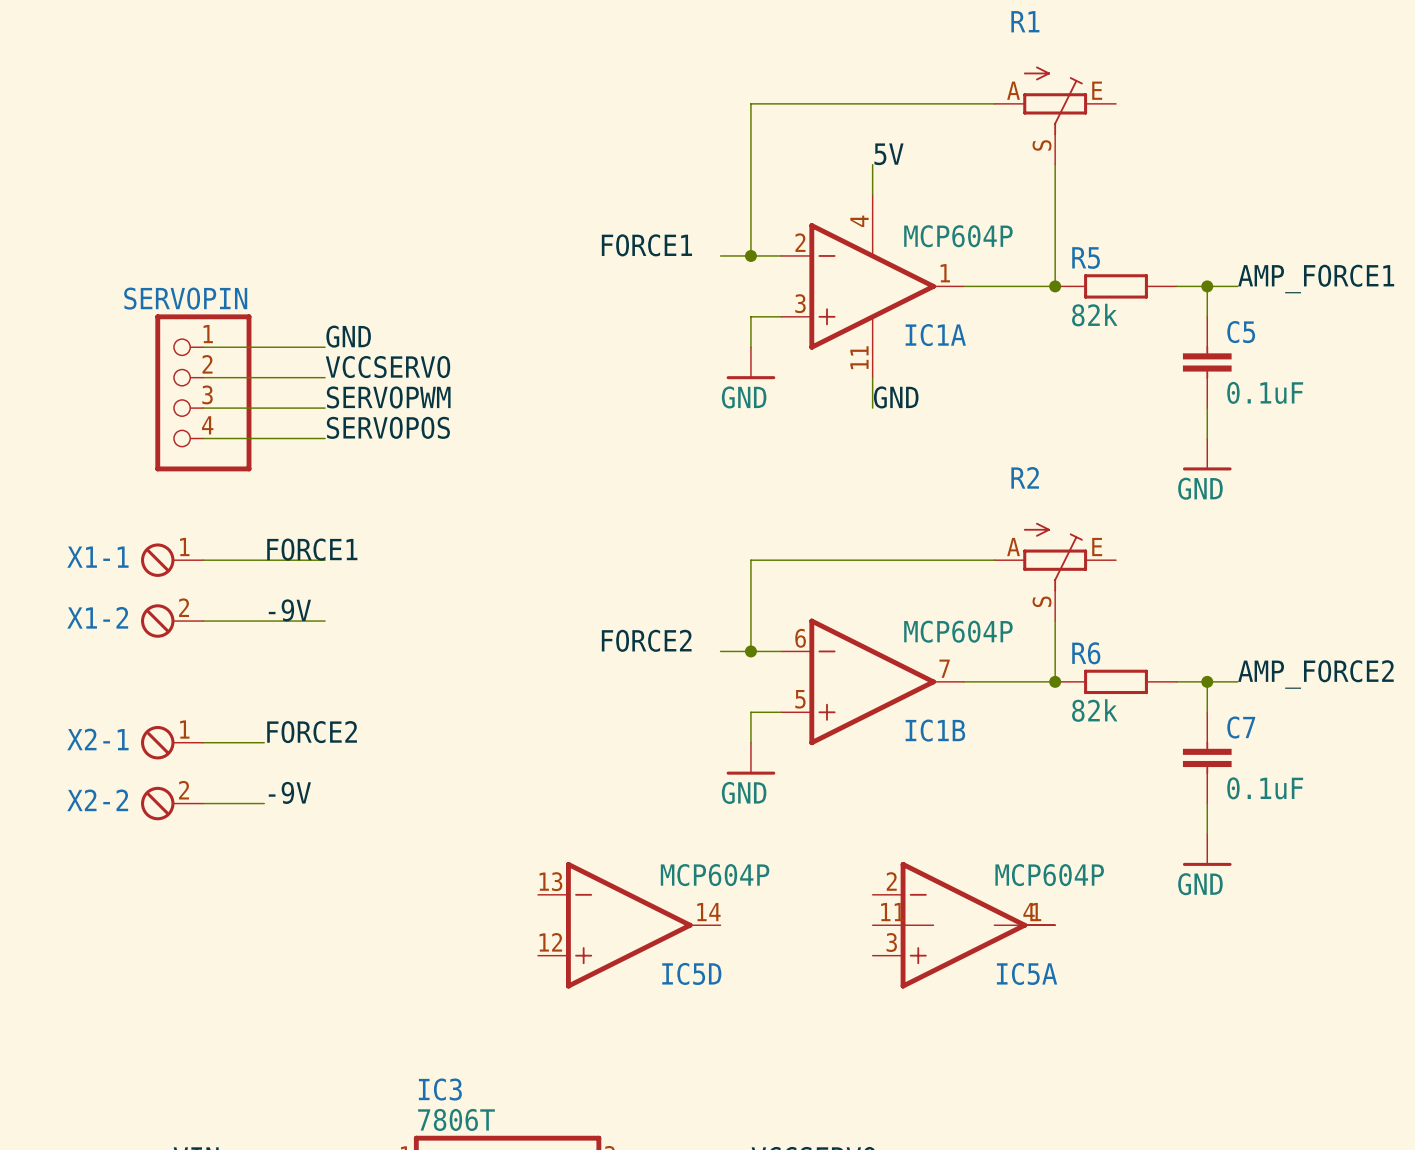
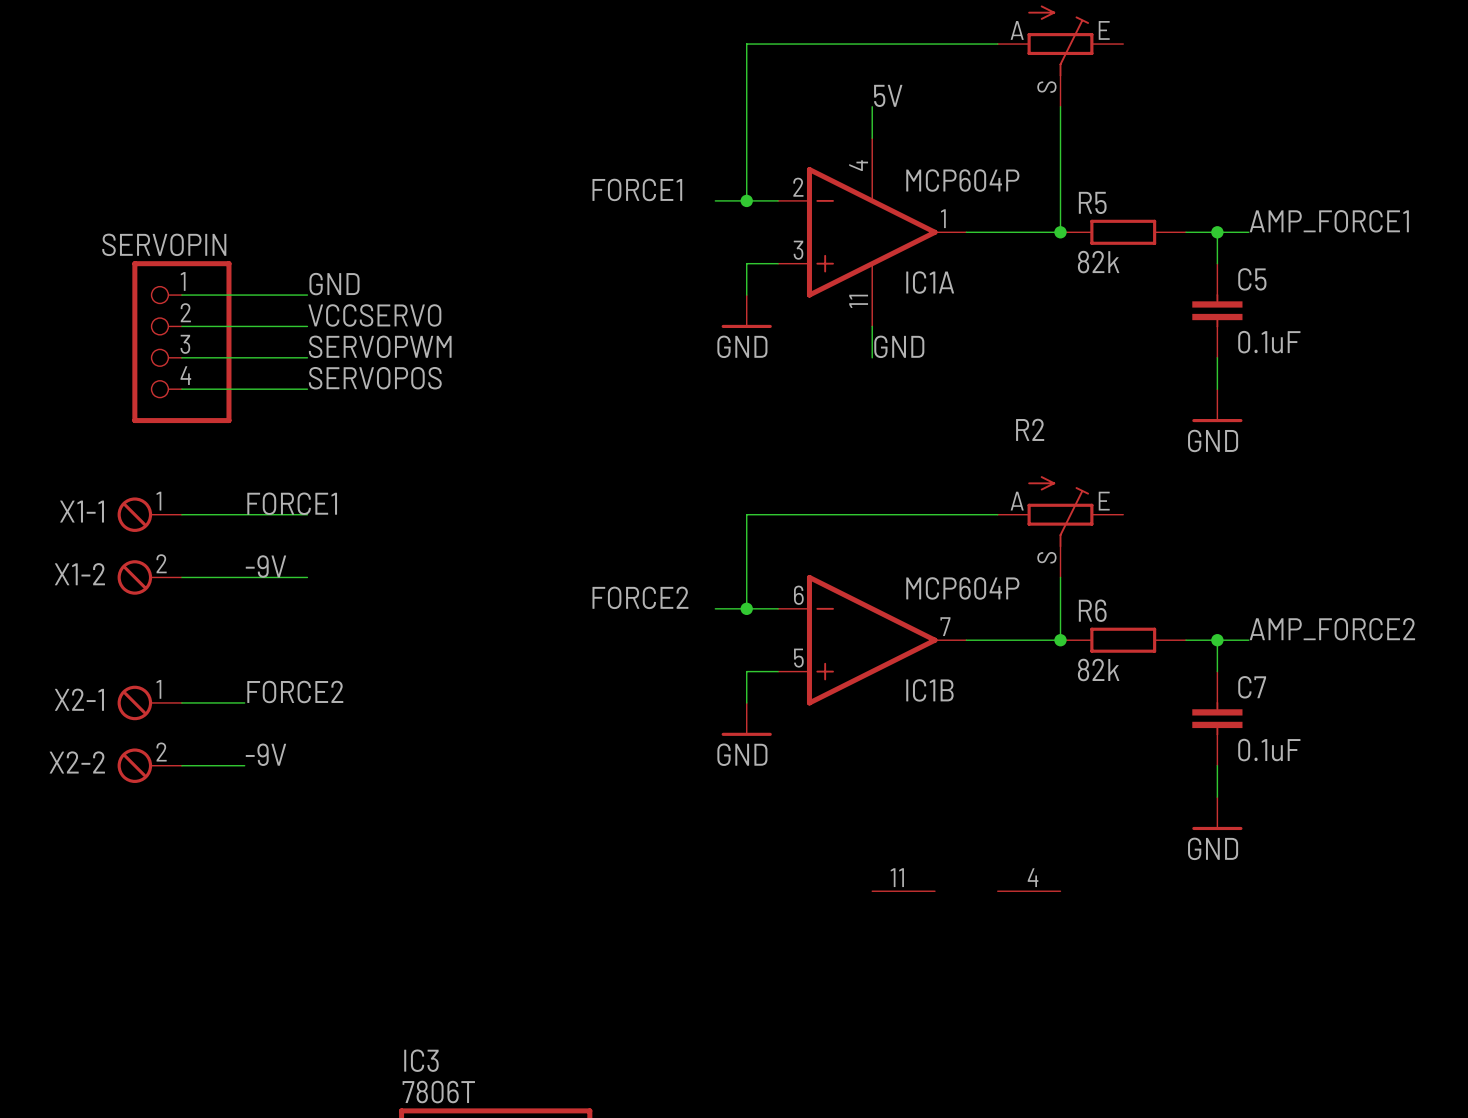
IC5D: MCP604P (629, 925) -> none
IC5A: MCP604P (963, 925) -> none

